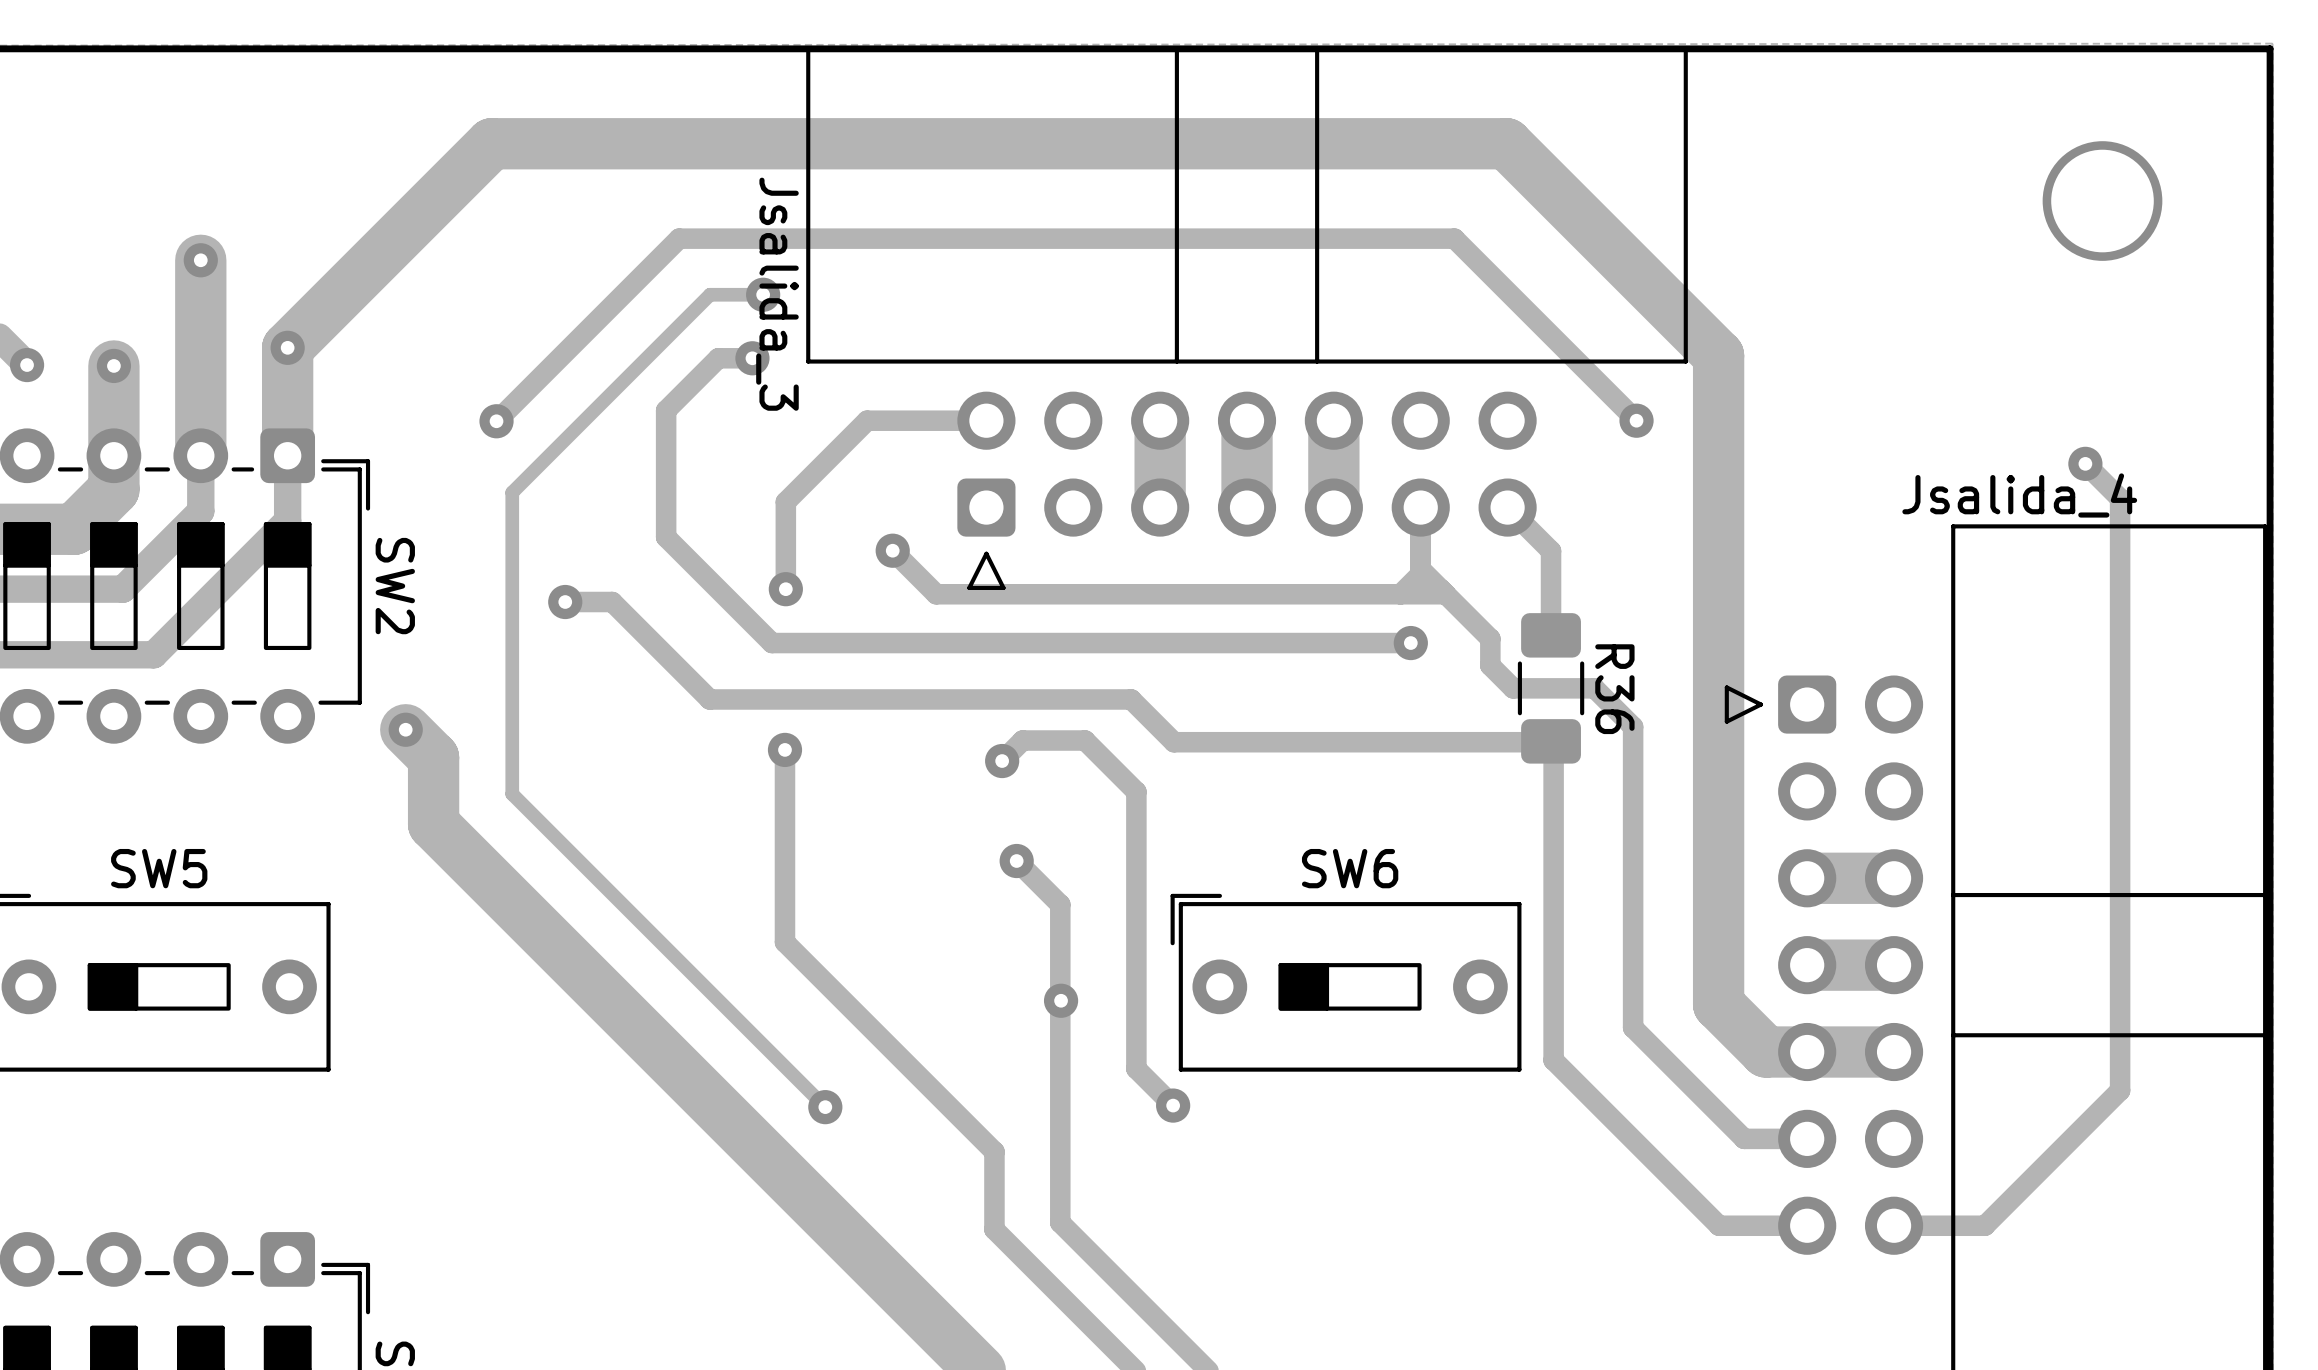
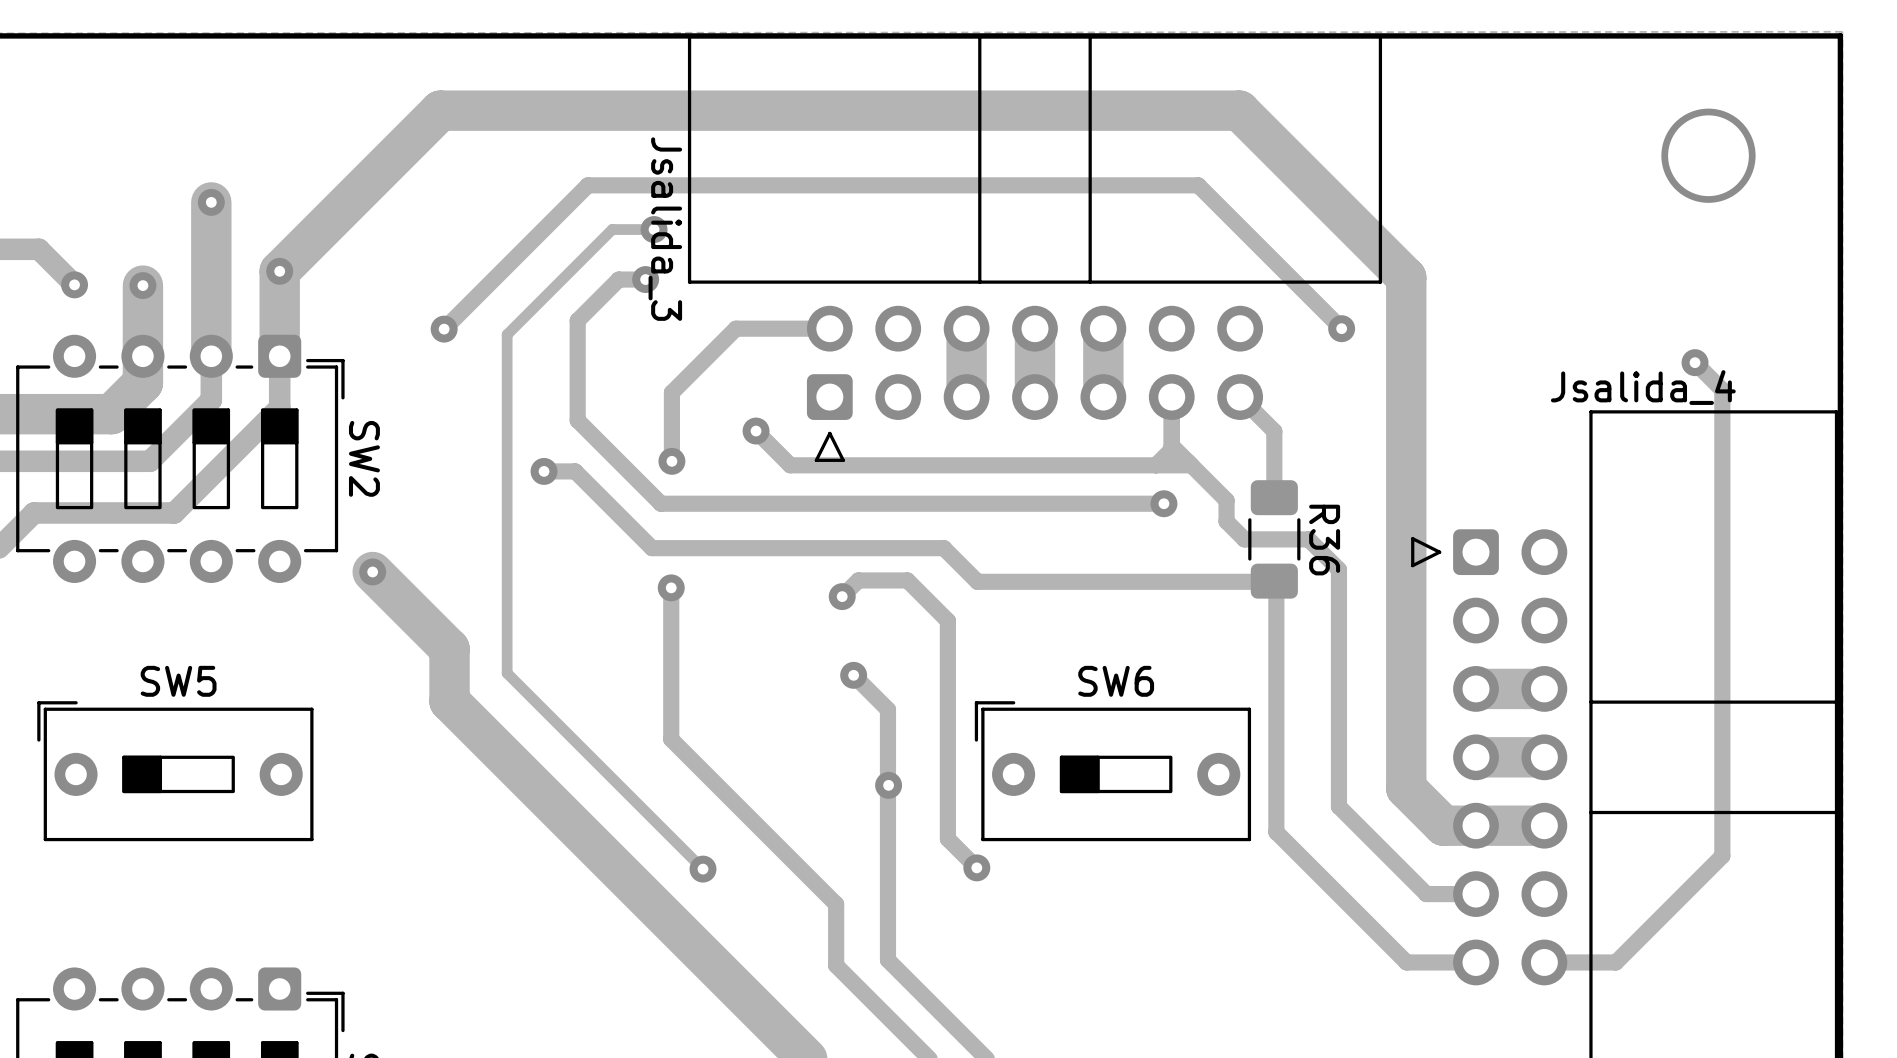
track: (576, 428) (512, 492) (512, 794) (576, 858) -> (507, 334) (507, 673)
track: (565, 602) (612, 602) (709, 699) (760, 699) -> (544, 471) (575, 471) (651, 548)
via position: (565, 602) -> (544, 471)
track: (433, 757) (433, 824) (503, 893) -> (394, 593) (449, 648) (449, 701)

